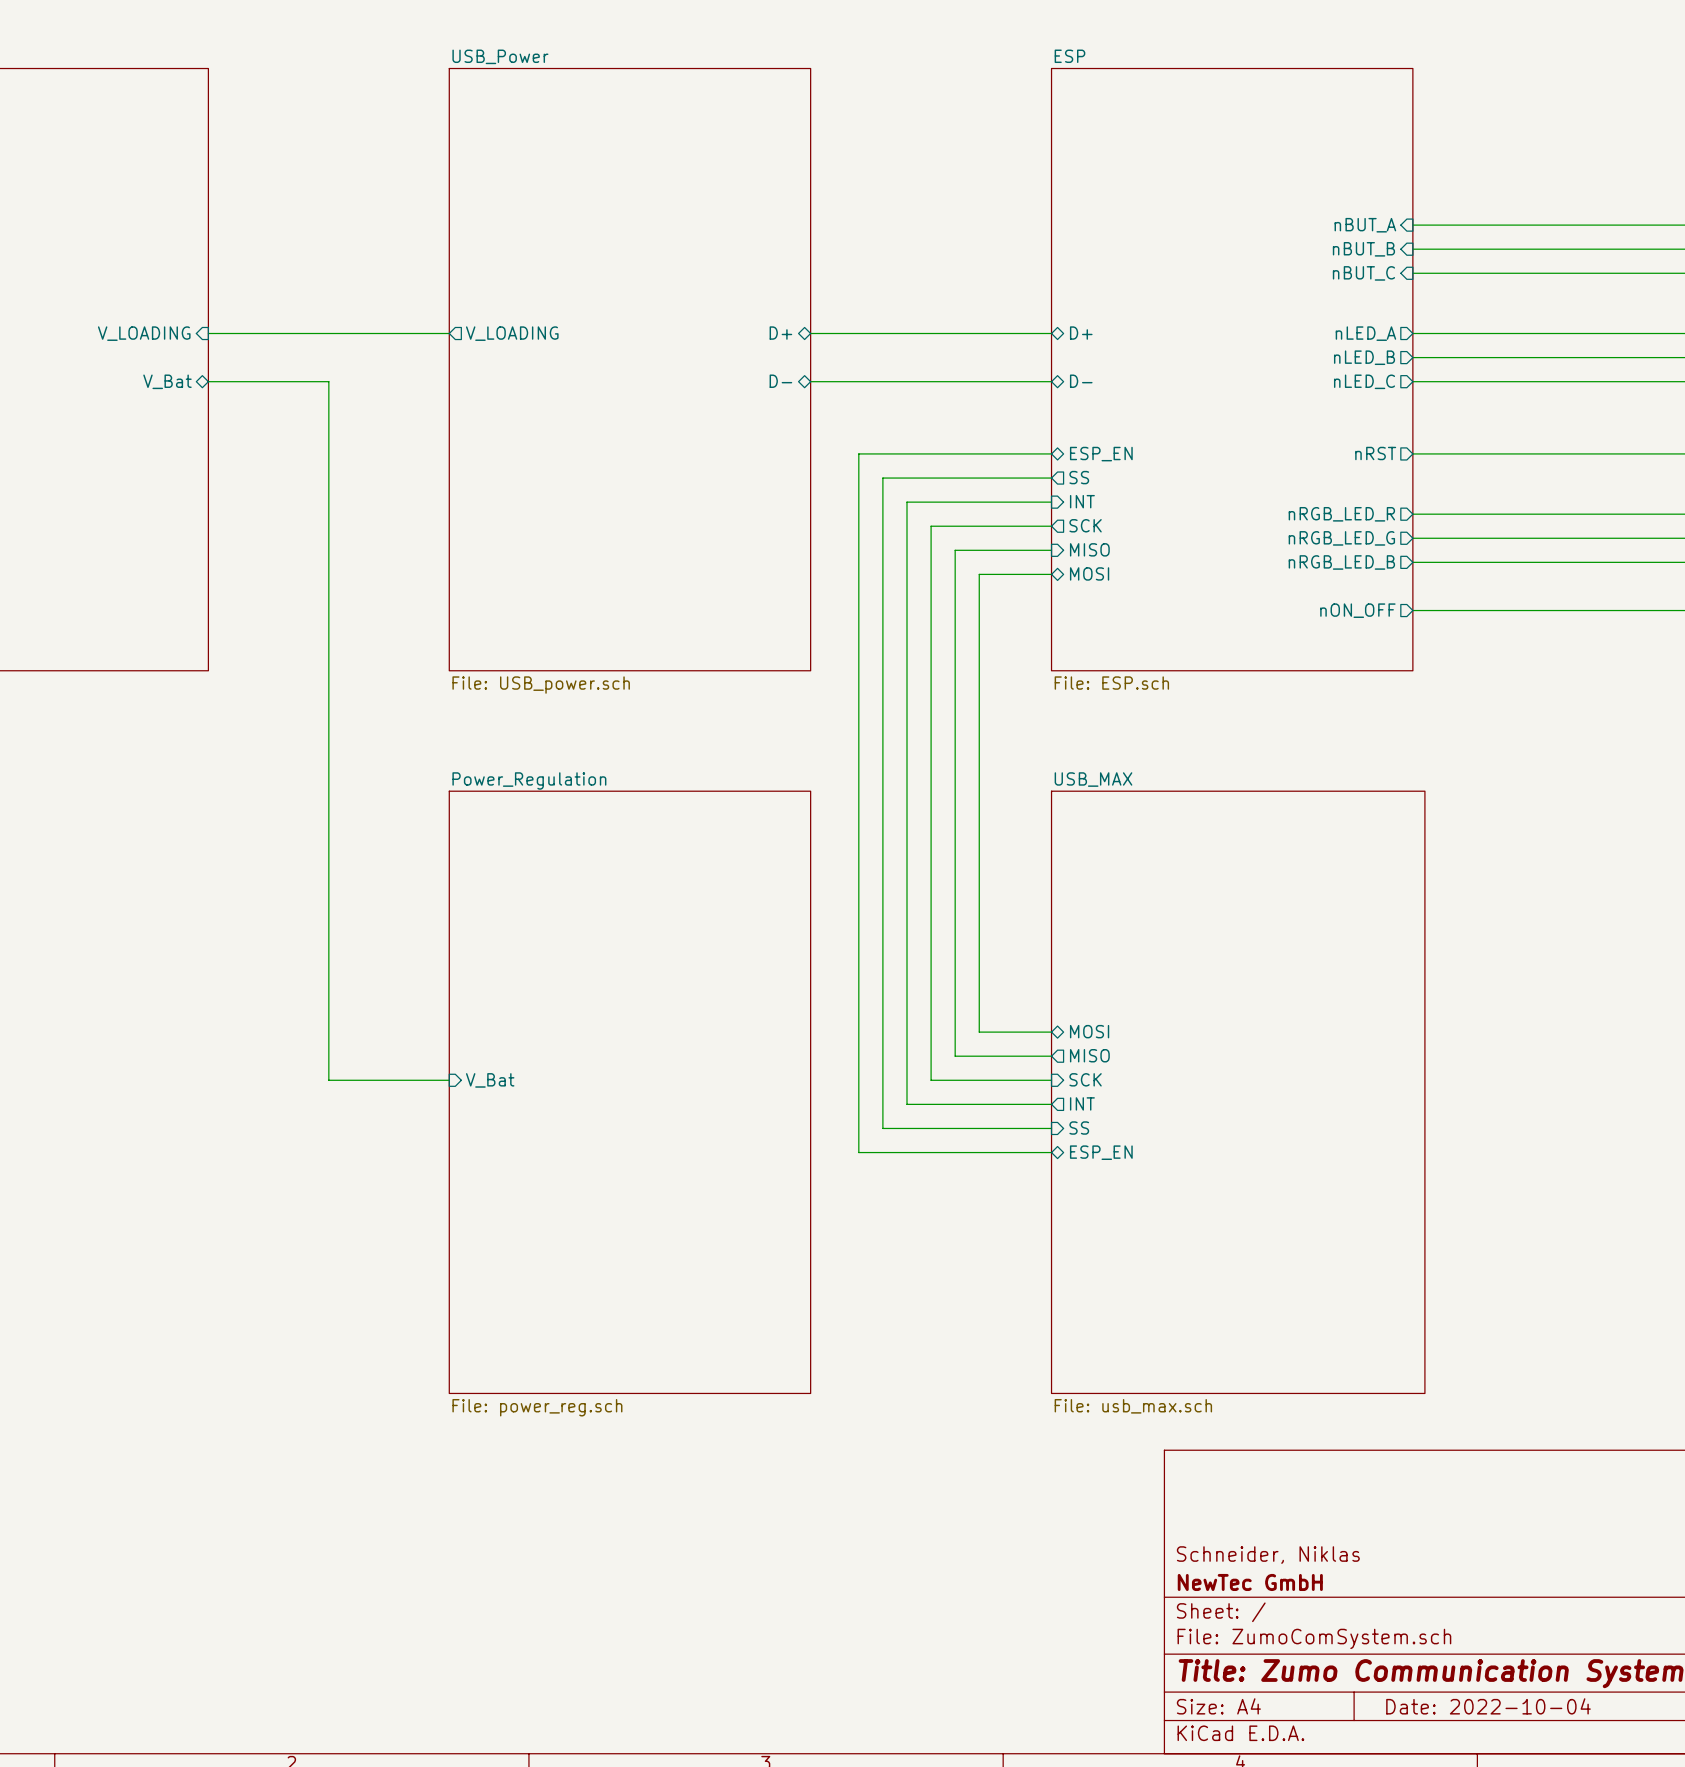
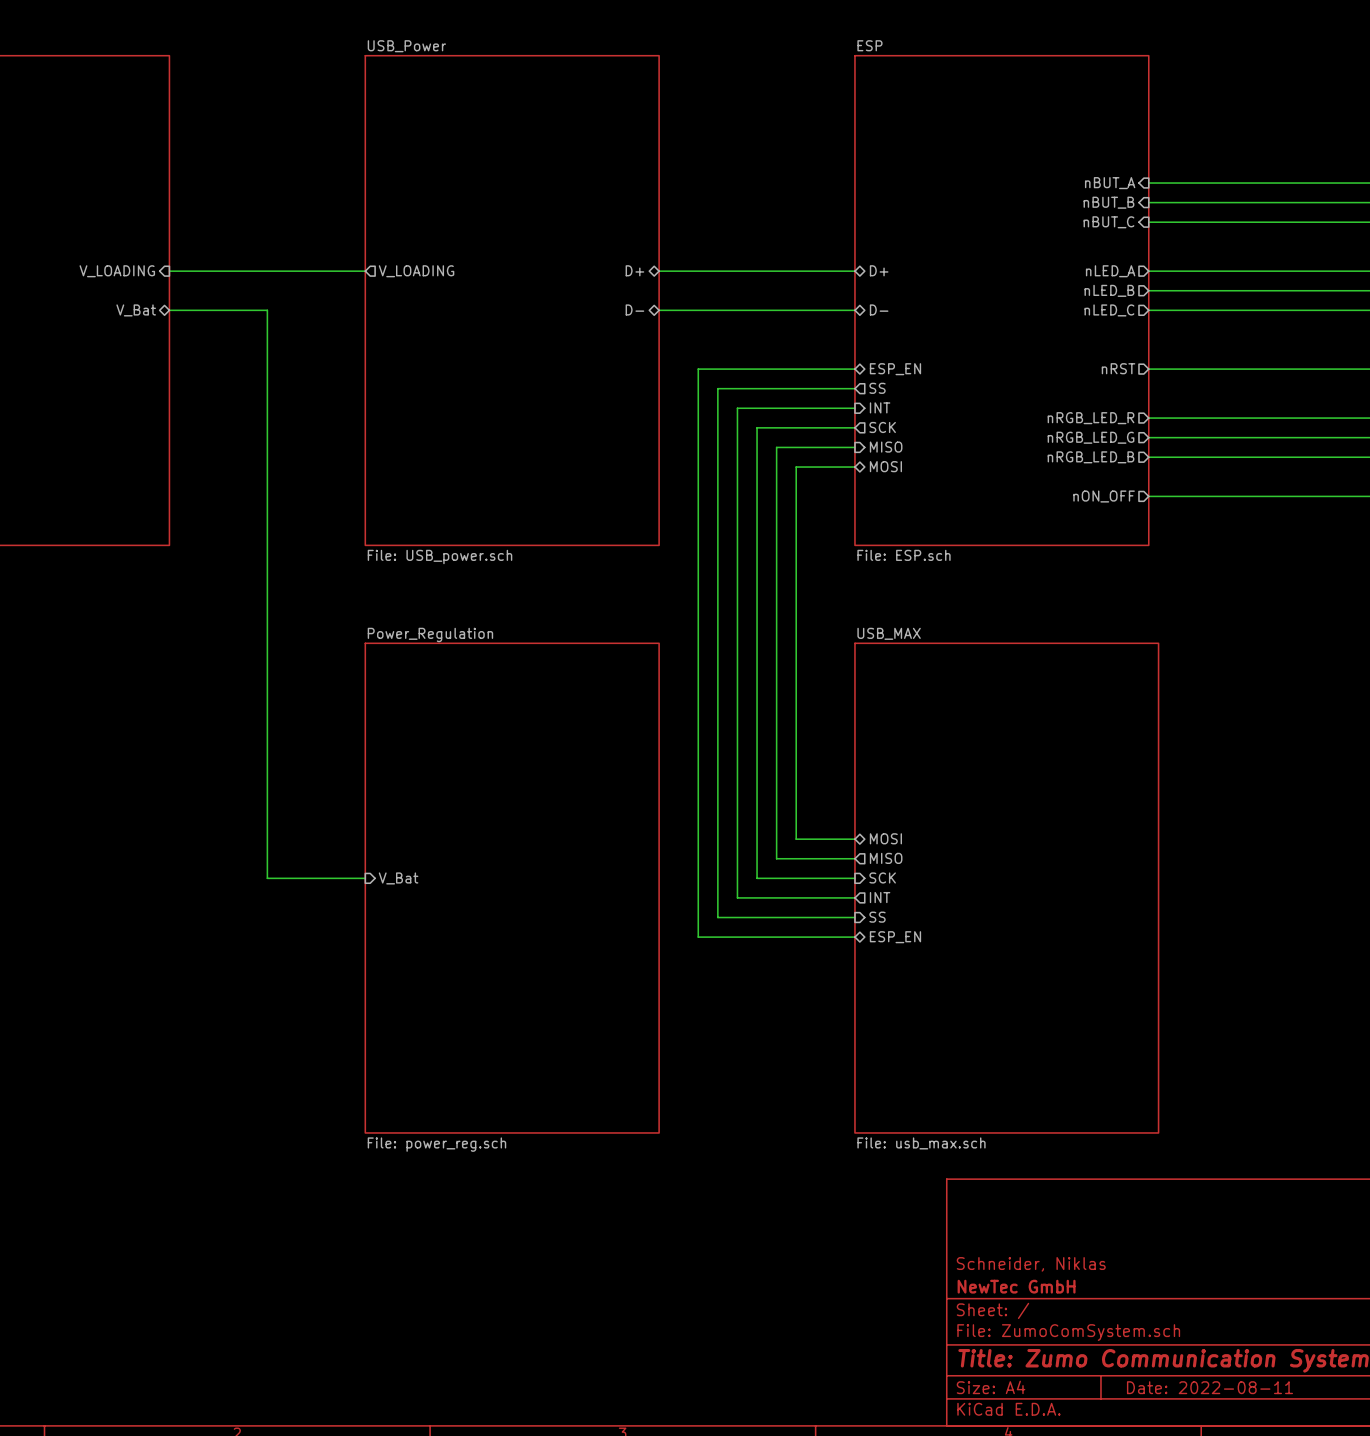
title block: Date: 2022-10-04 (1488, 1706) -> Date: 2022-08-11 (1209, 1387)

